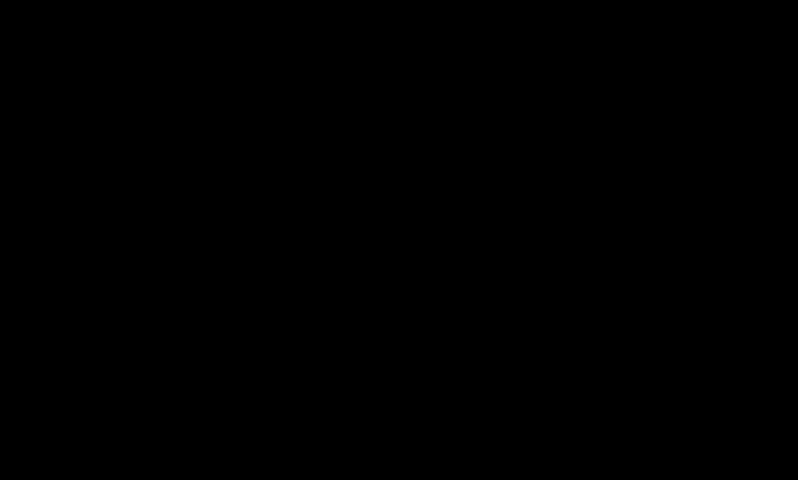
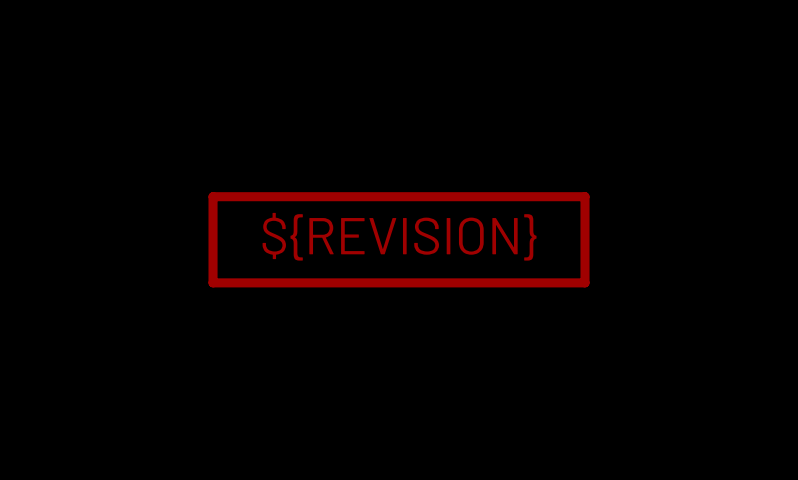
track: none -> (213, 196) (584, 196) (584, 282) (213, 282) (213, 196)
text: none -> ${REVISION} (399, 236)

